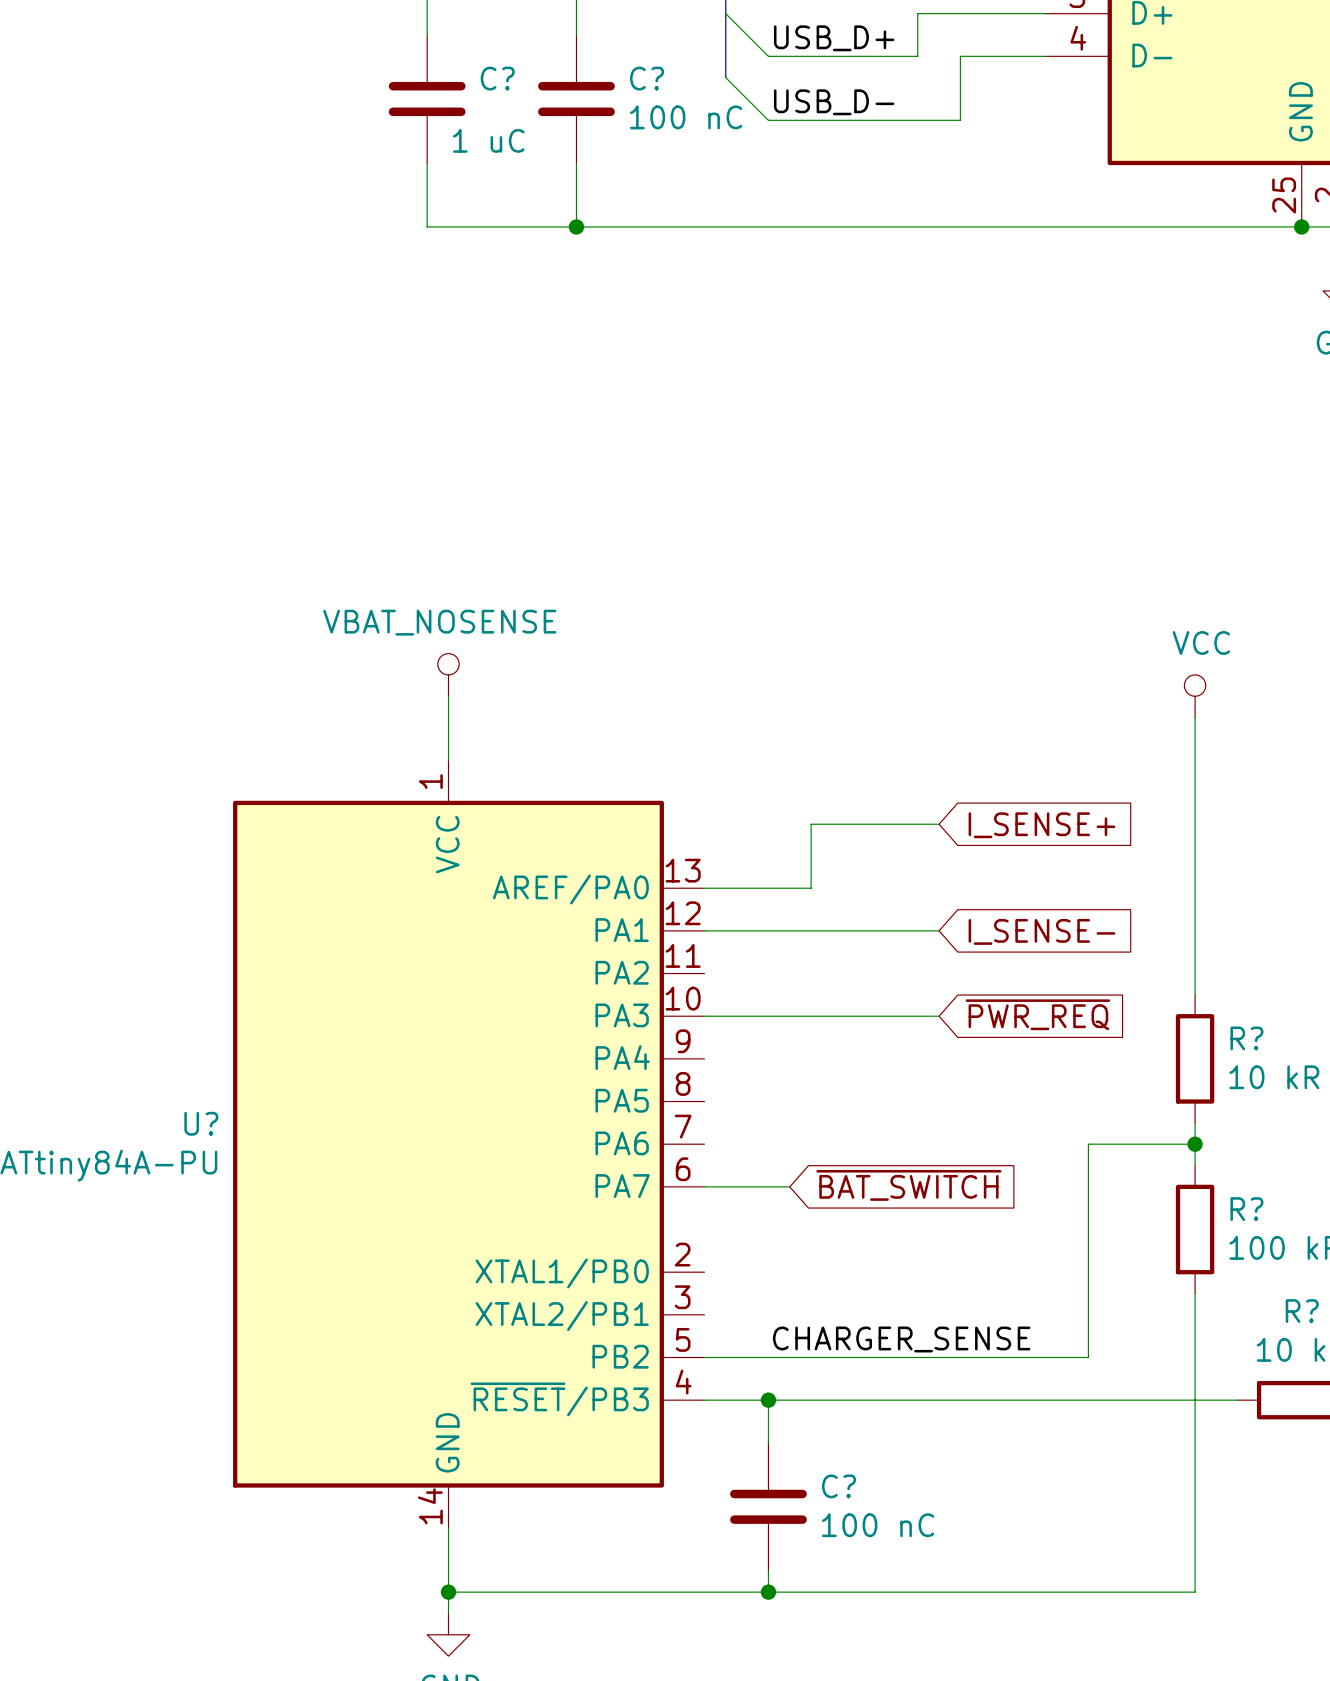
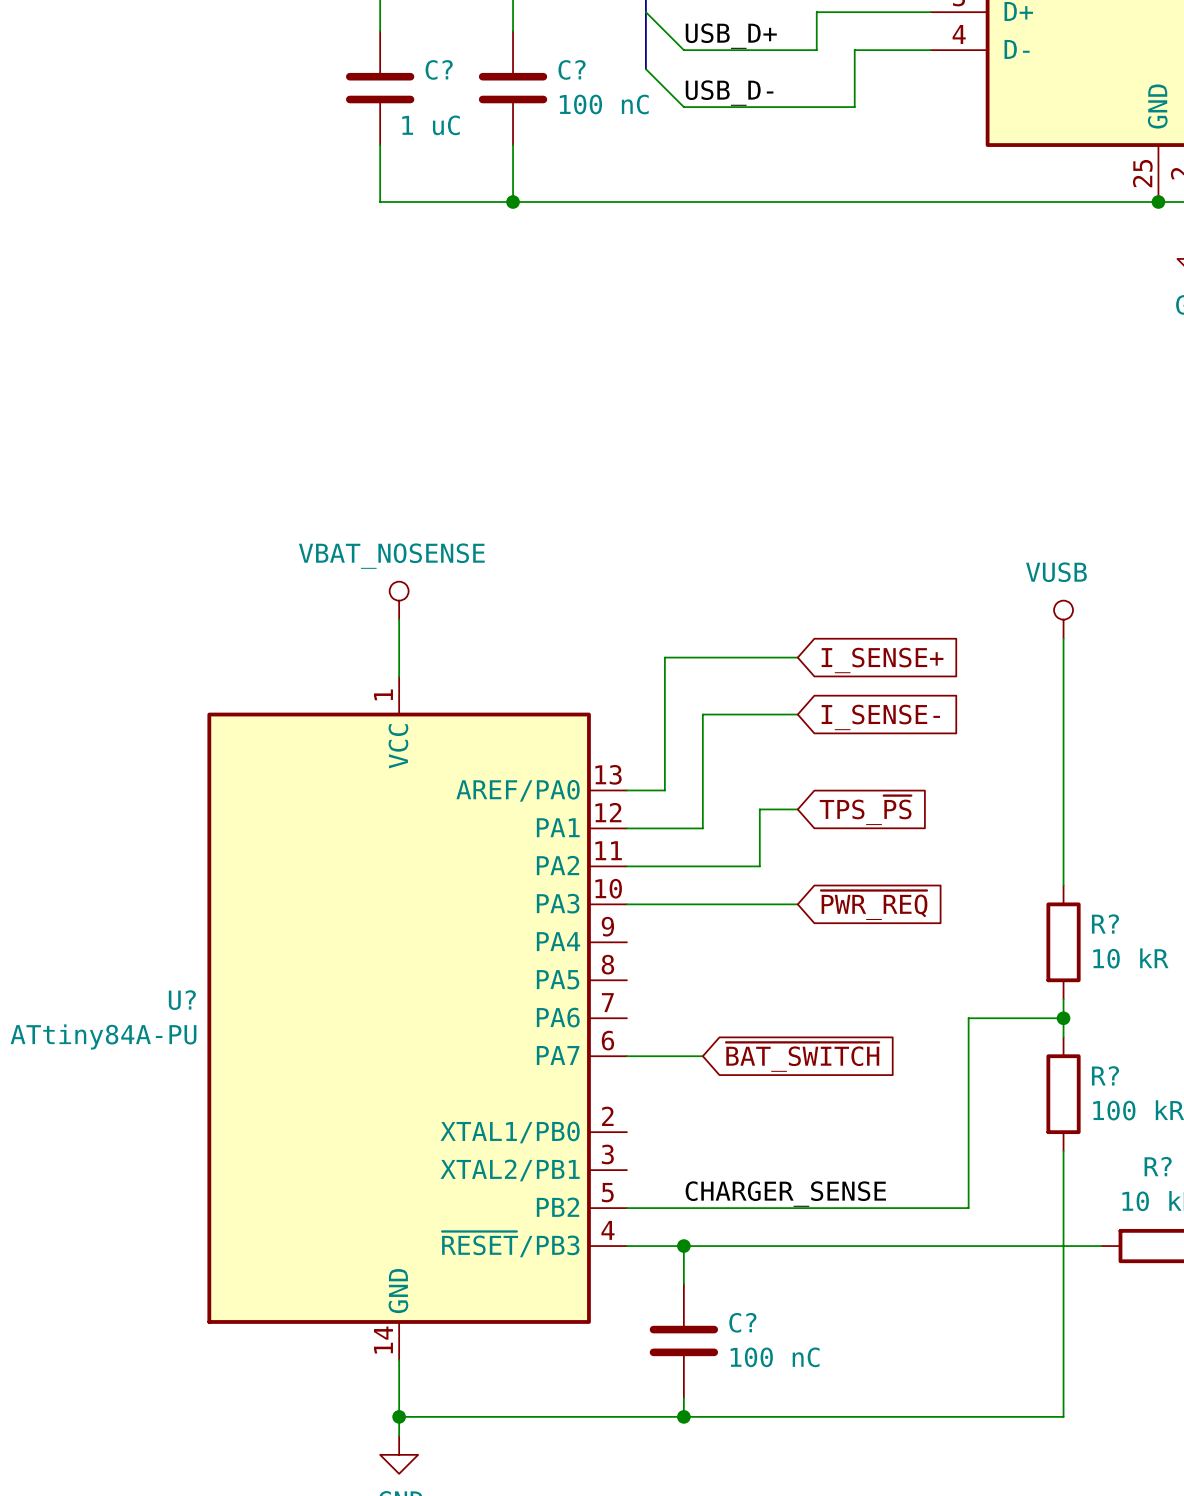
power symbol: VCC (1195, 696) -> VUSB (1063, 619)
wire: (939, 824) (811, 824) (811, 888) (747, 888) -> (797, 657) (664, 657) (664, 790)
global label position: I_SENSE+ (1041, 825) -> I_SENSE+ (882, 660)
global label: none -> TPS_~{PS} (865, 810)
wire: none -> (797, 809) (759, 809) (759, 866) (626, 866)
wire: (789, 930) (939, 930) -> (702, 828) (702, 714) (797, 714)
global label position: I_SENSE- (1041, 931) -> I_SENSE- (880, 717)
global label position: ~{PWR_REQ} (1037, 1014) -> ~{PWR_REQ} (874, 905)
wire: (896, 1016) (939, 1016) -> none

